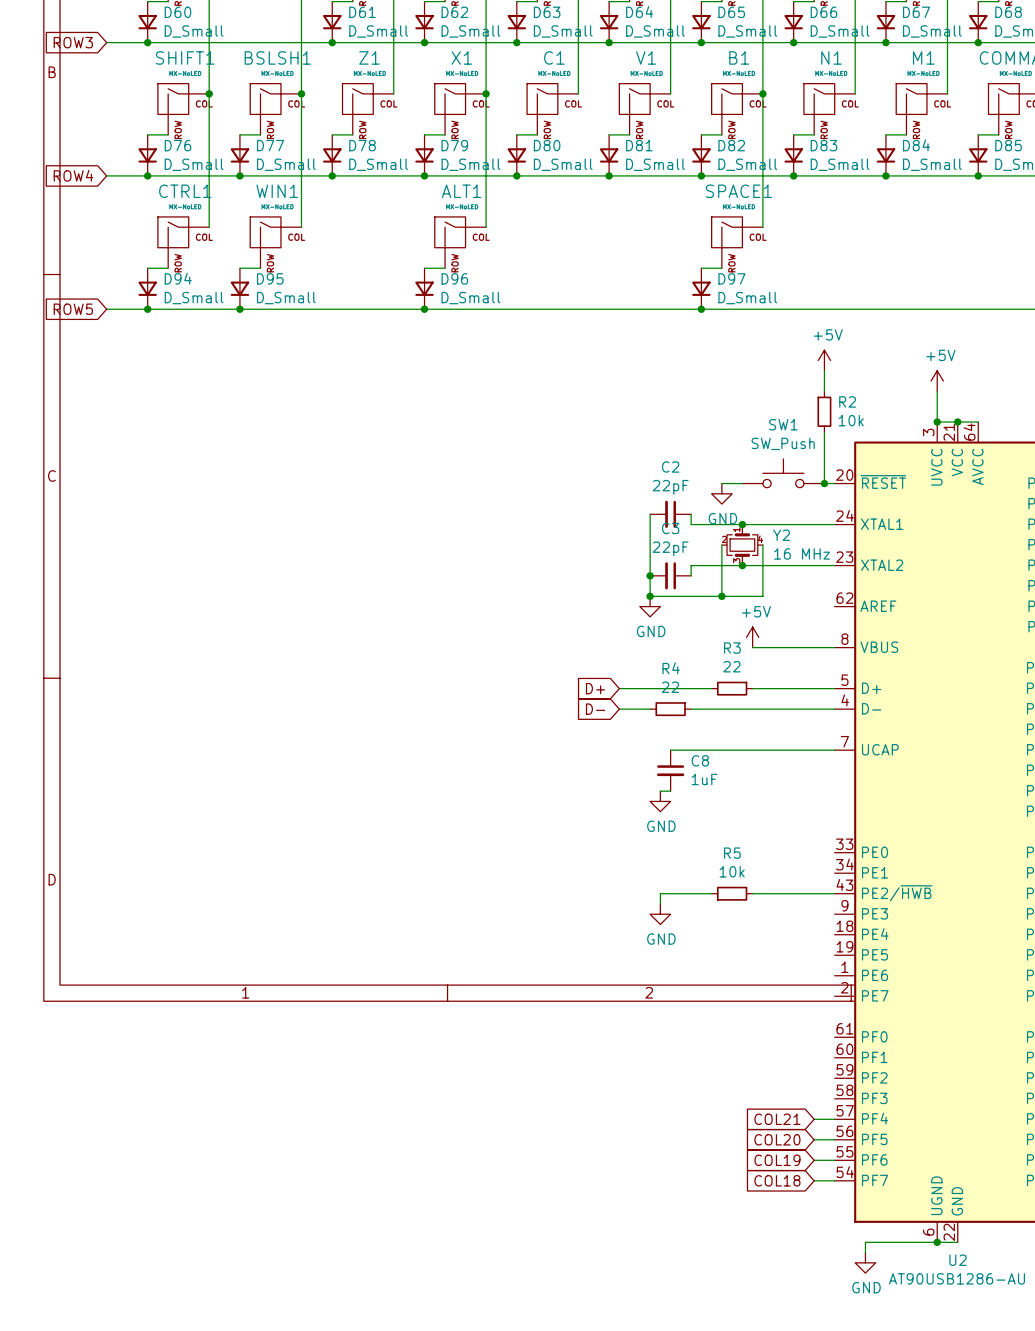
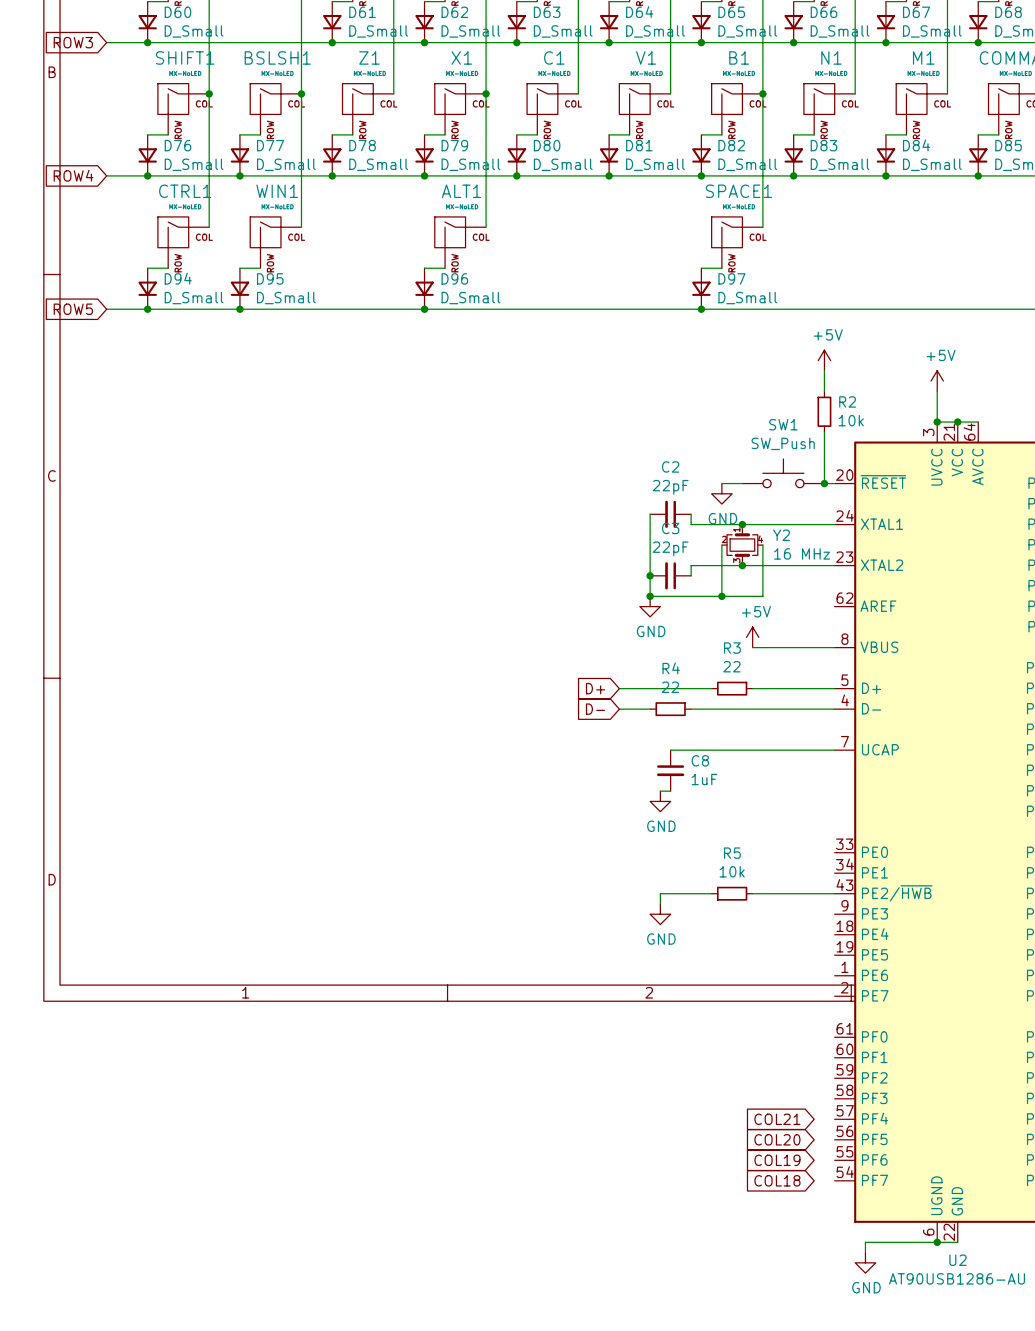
wire: (814, 1119) (834, 1119) -> none
wire: (814, 1139) (834, 1139) -> none
wire: (814, 1160) (834, 1160) -> none
wire: (814, 1180) (834, 1180) -> none

